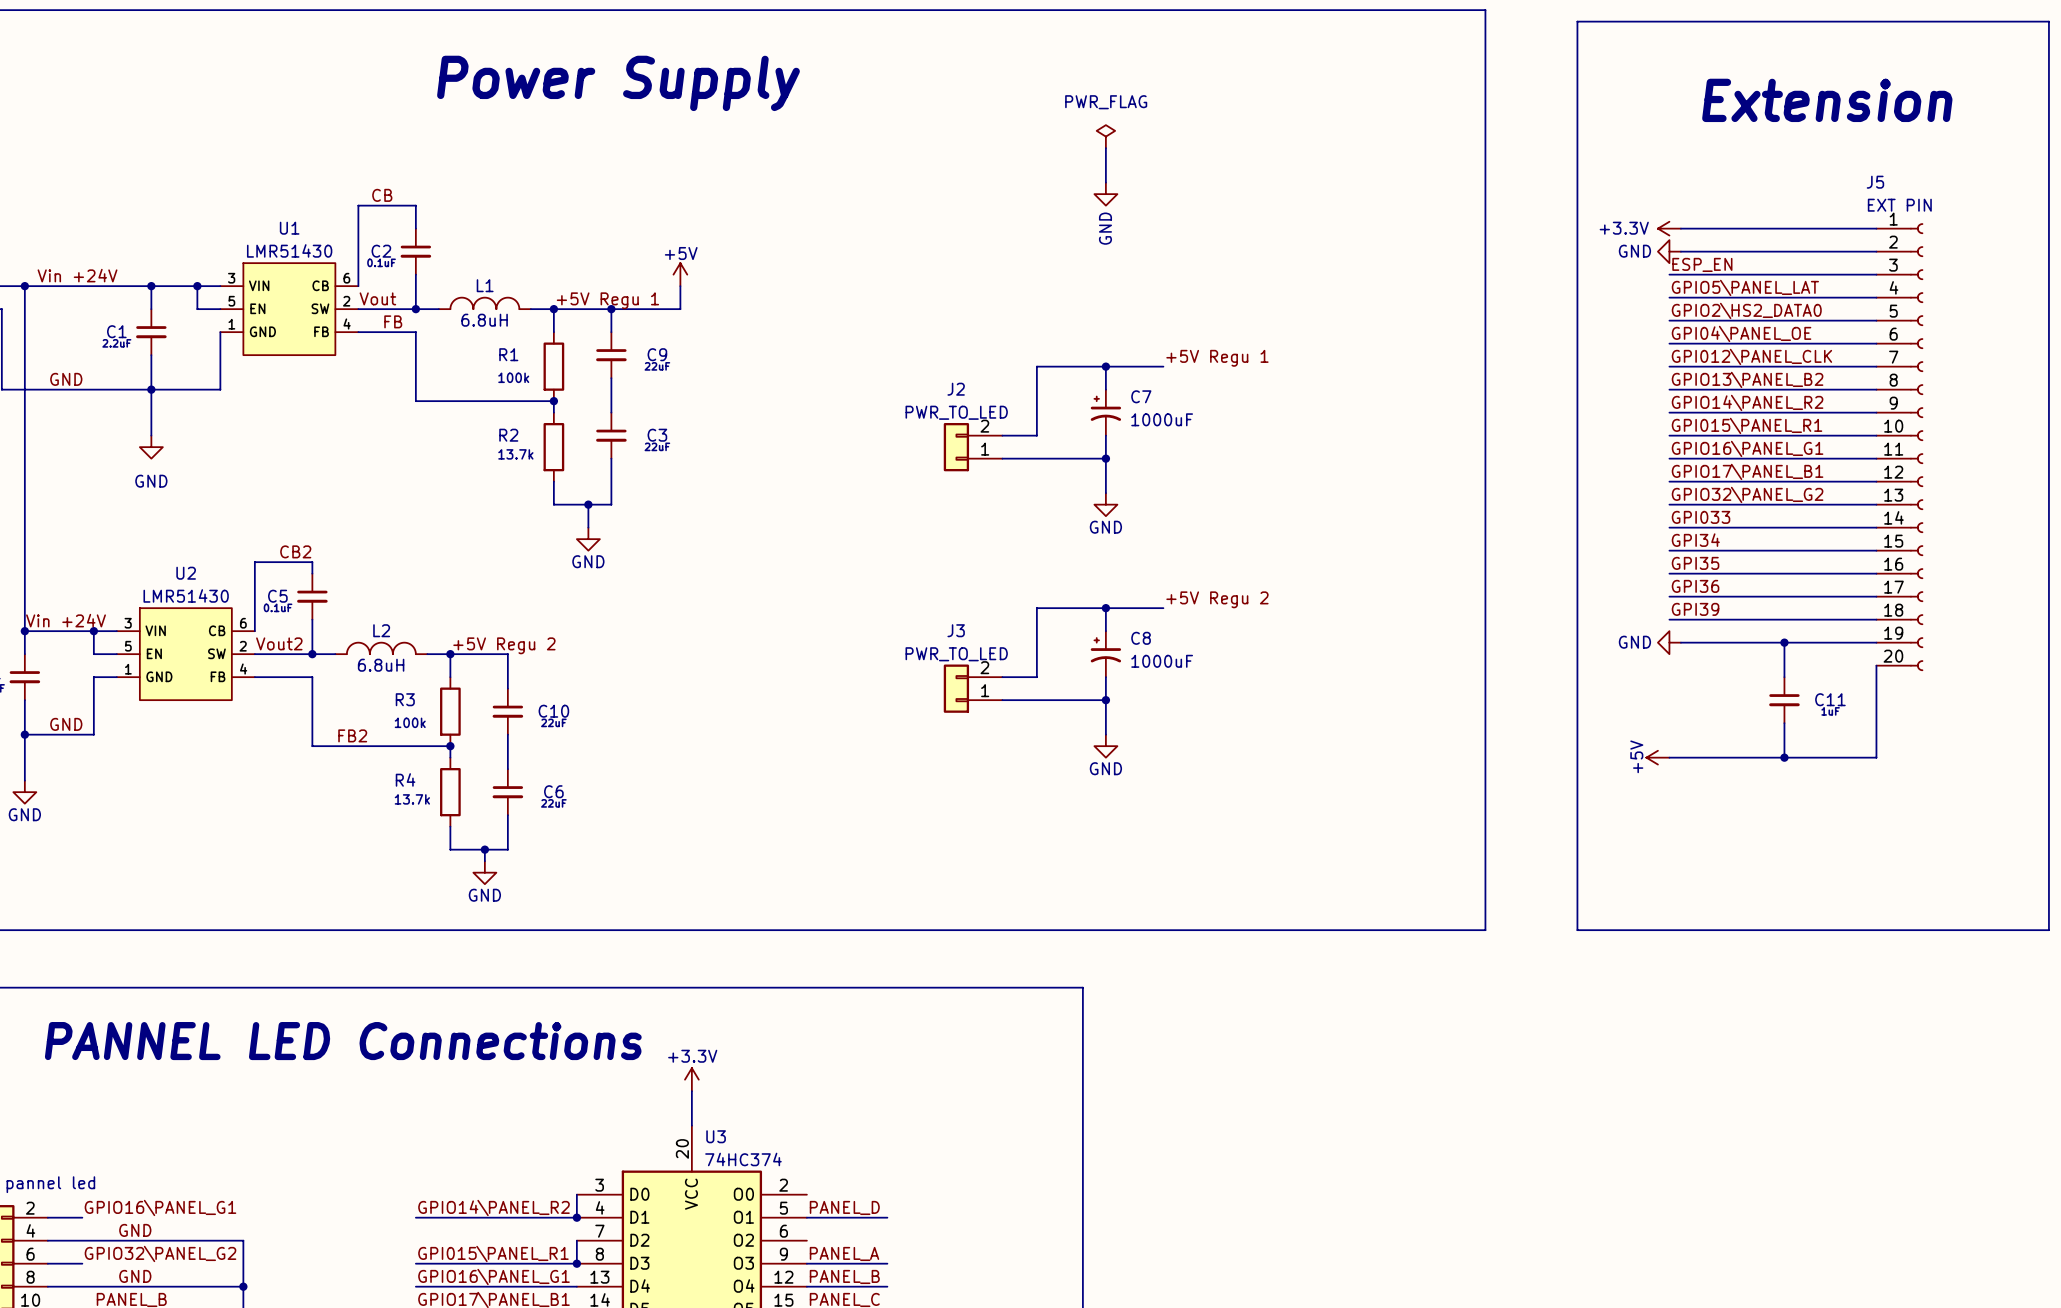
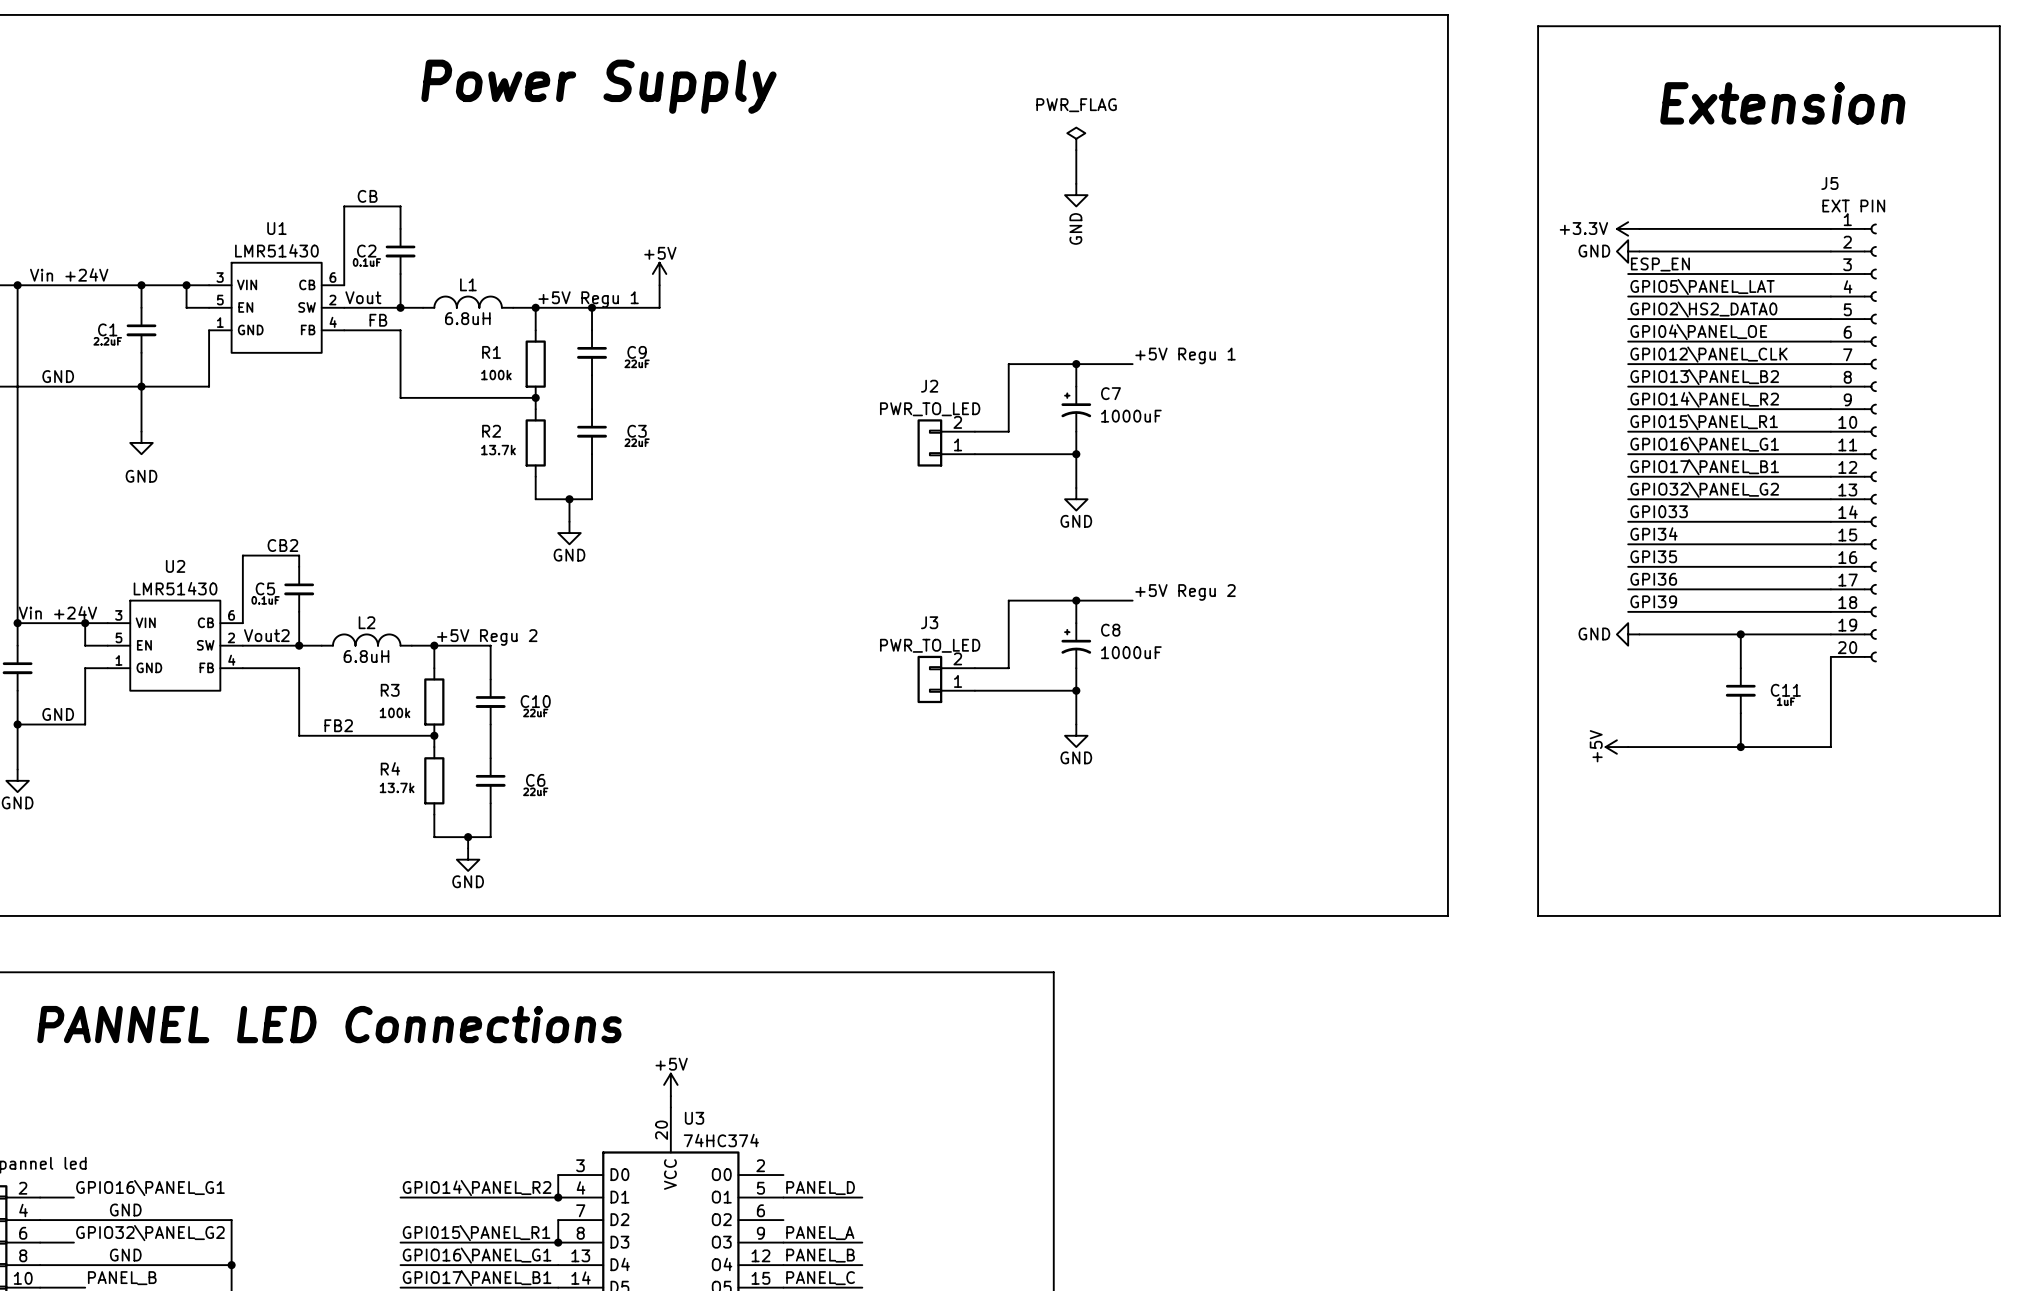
power symbol: +3.3V (691, 1079) -> none
power symbol: none -> +5V (670, 1084)

